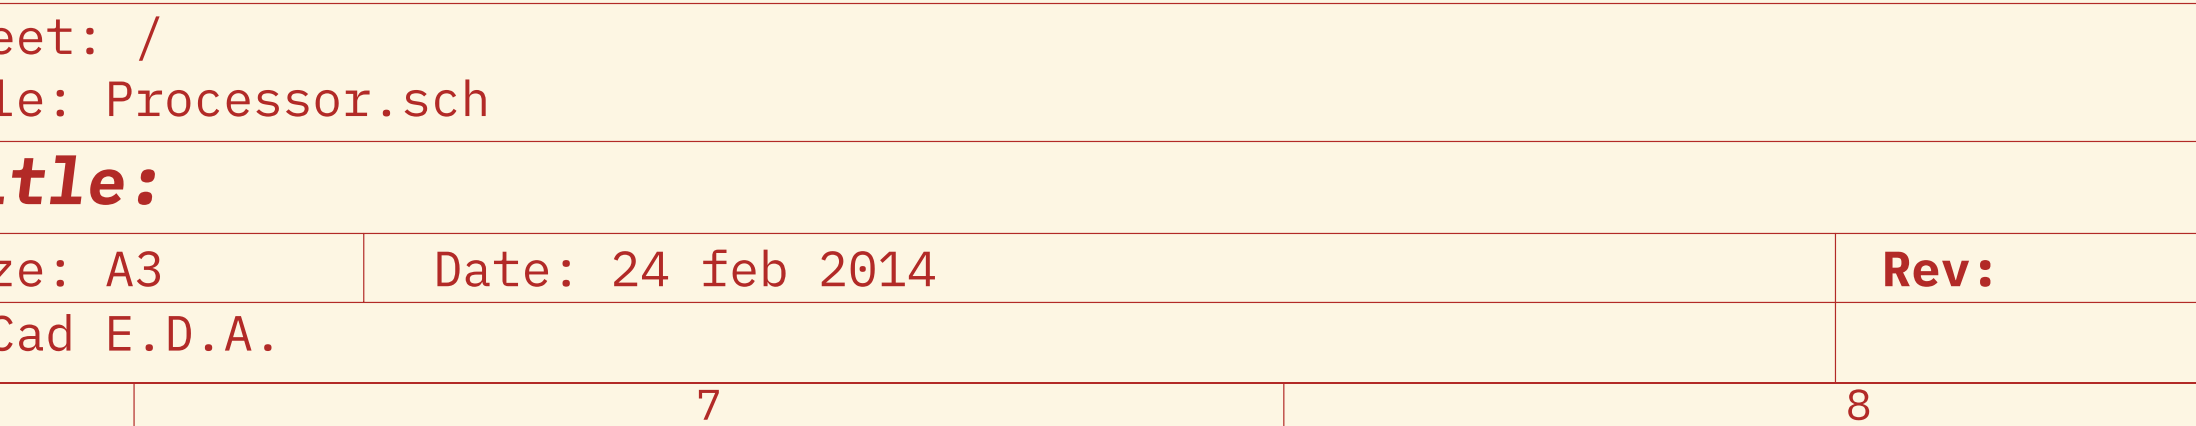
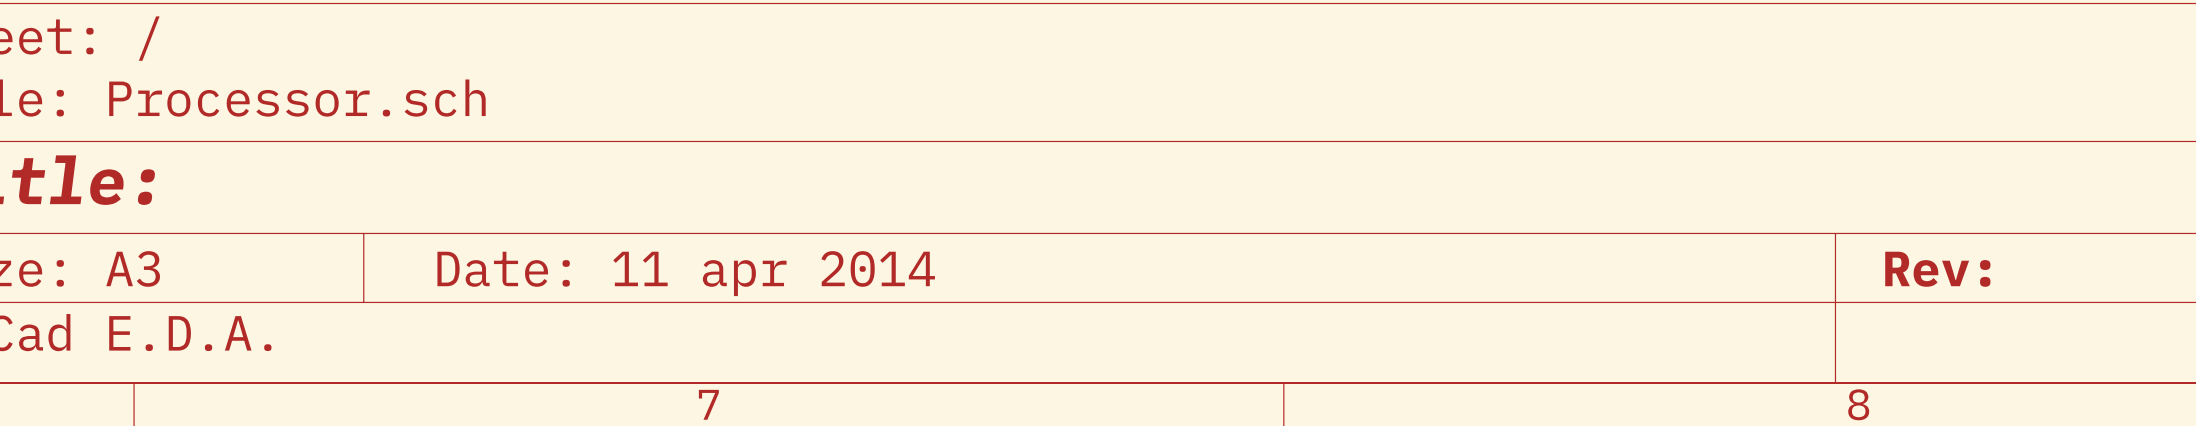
title block: Date: 24 feb 2014 (686, 268) -> Date: 11 apr 2014 (686, 273)

